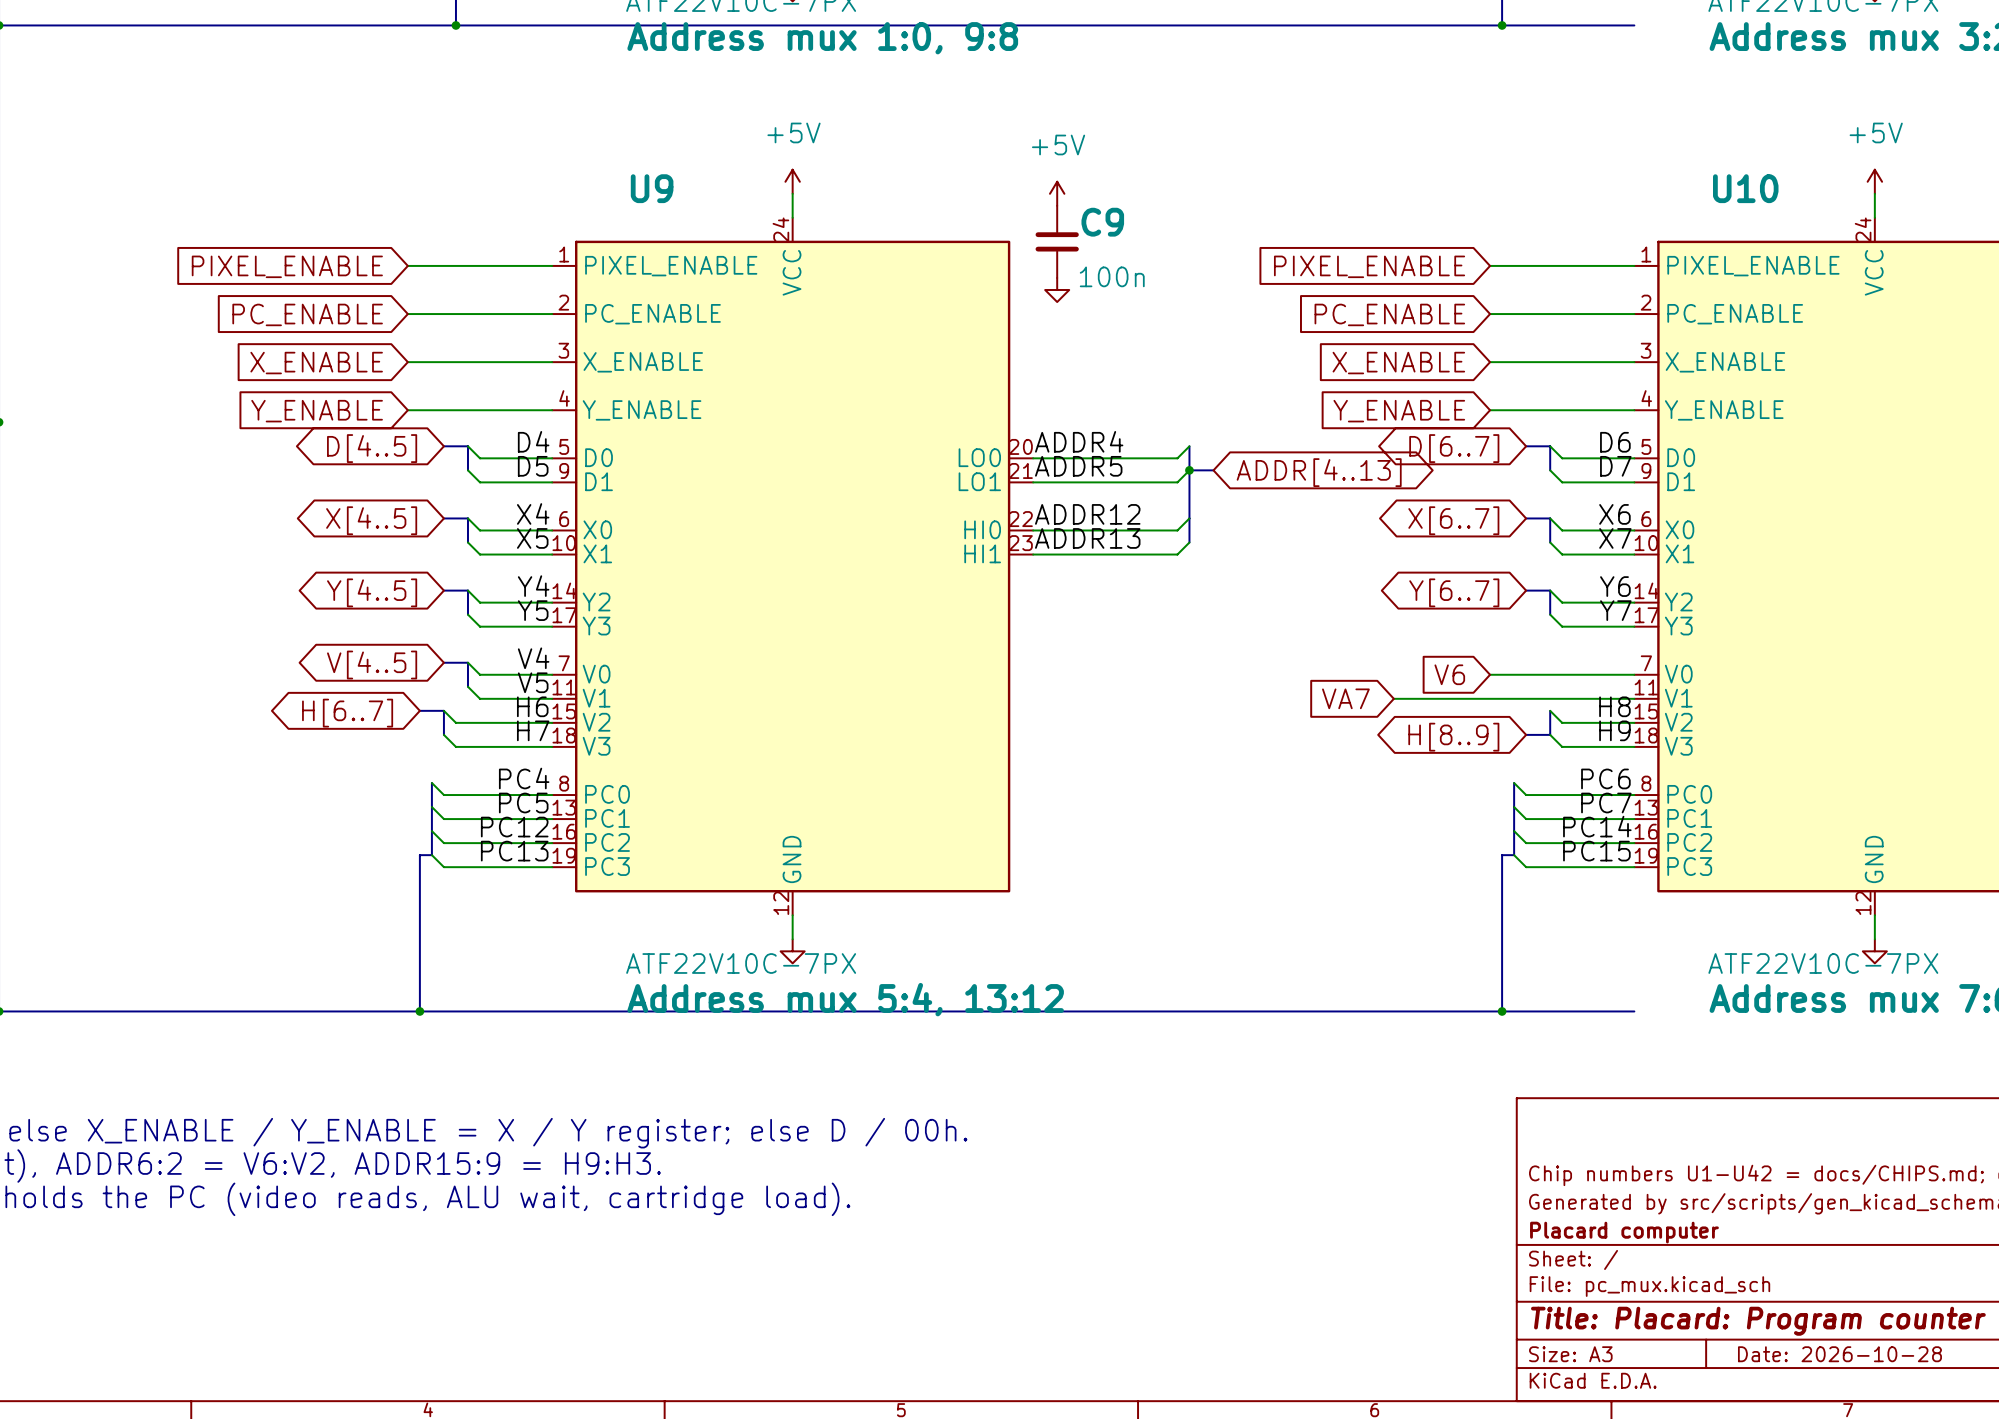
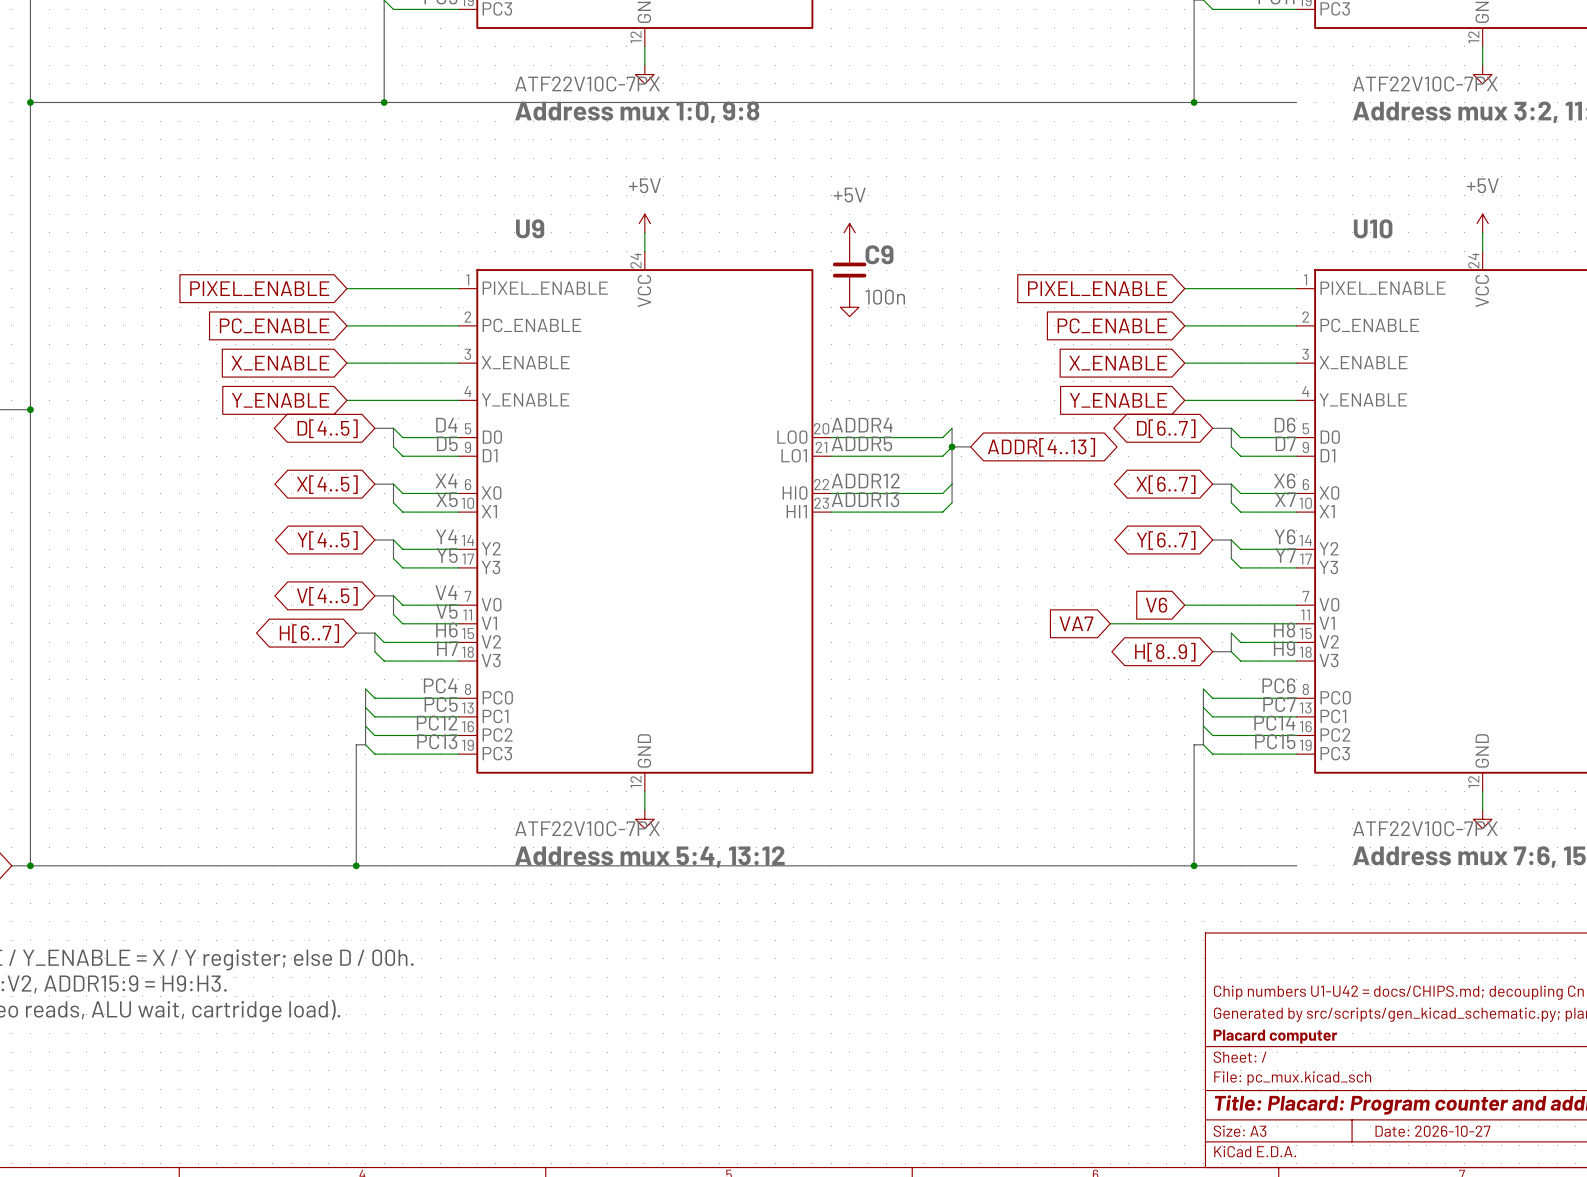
title block: Date: 2026-10-28 (1839, 1354) -> Date: 2026-10-27 (1432, 1131)

